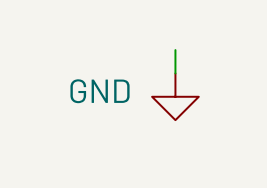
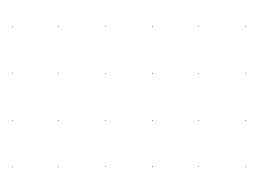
wire: (175, 50) (175, 73) -> none
power symbol: GND (175, 96) -> none

